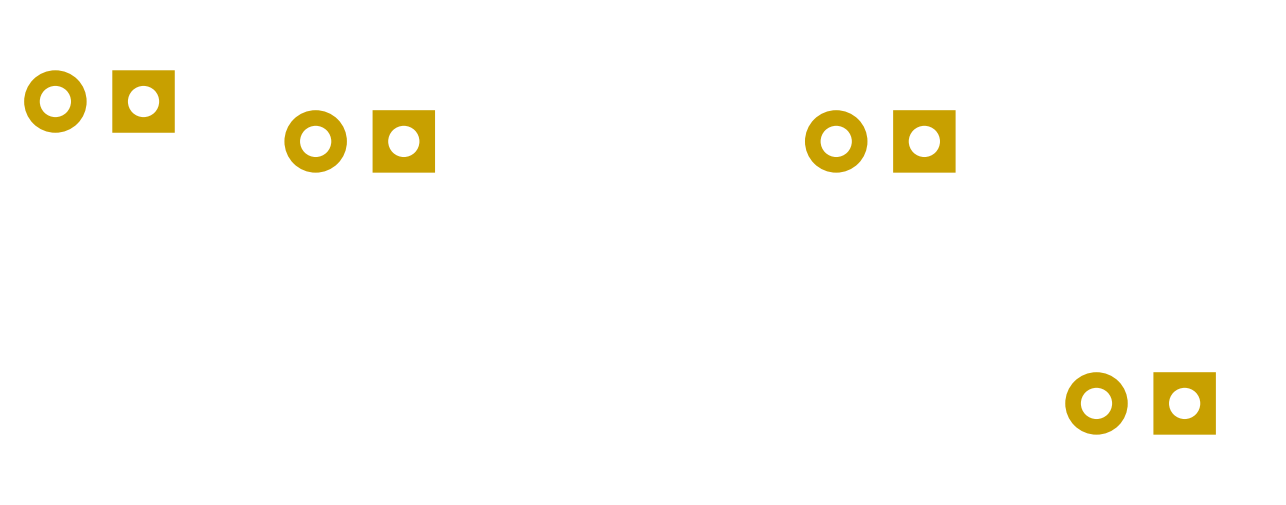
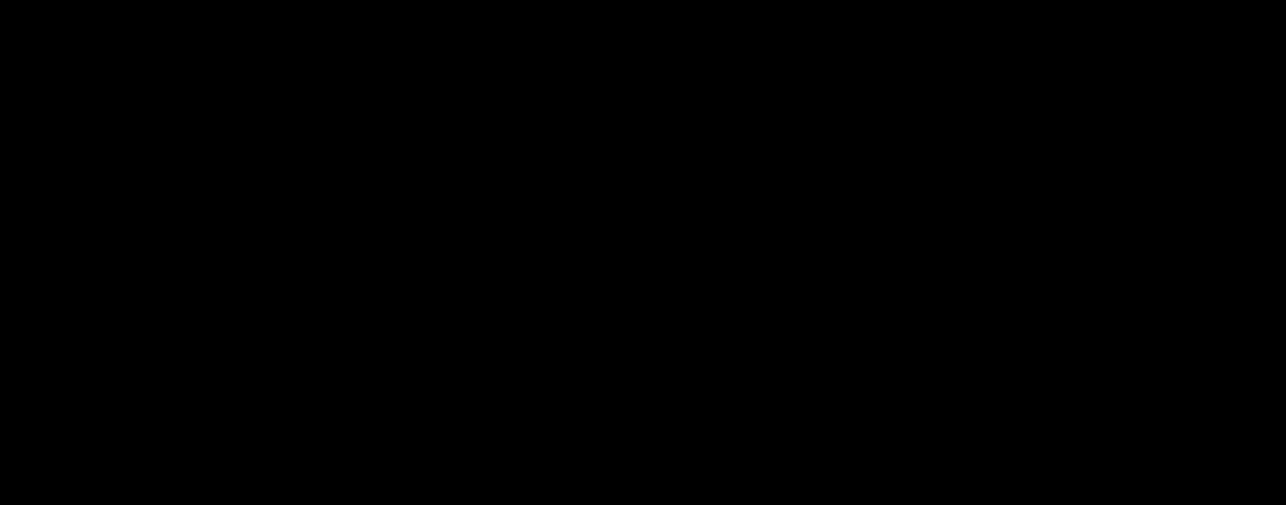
part: (99, 101) -> none
part: (359, 141) -> none
part: (880, 141) -> none
part: (1140, 403) -> none

